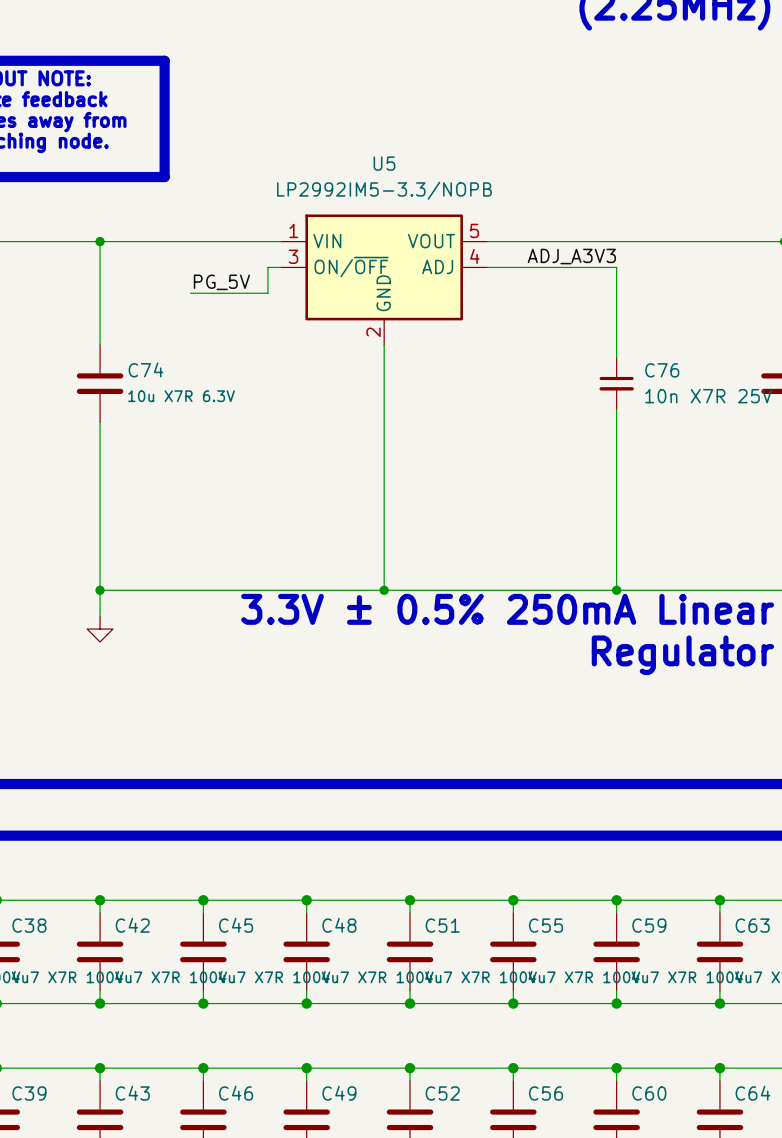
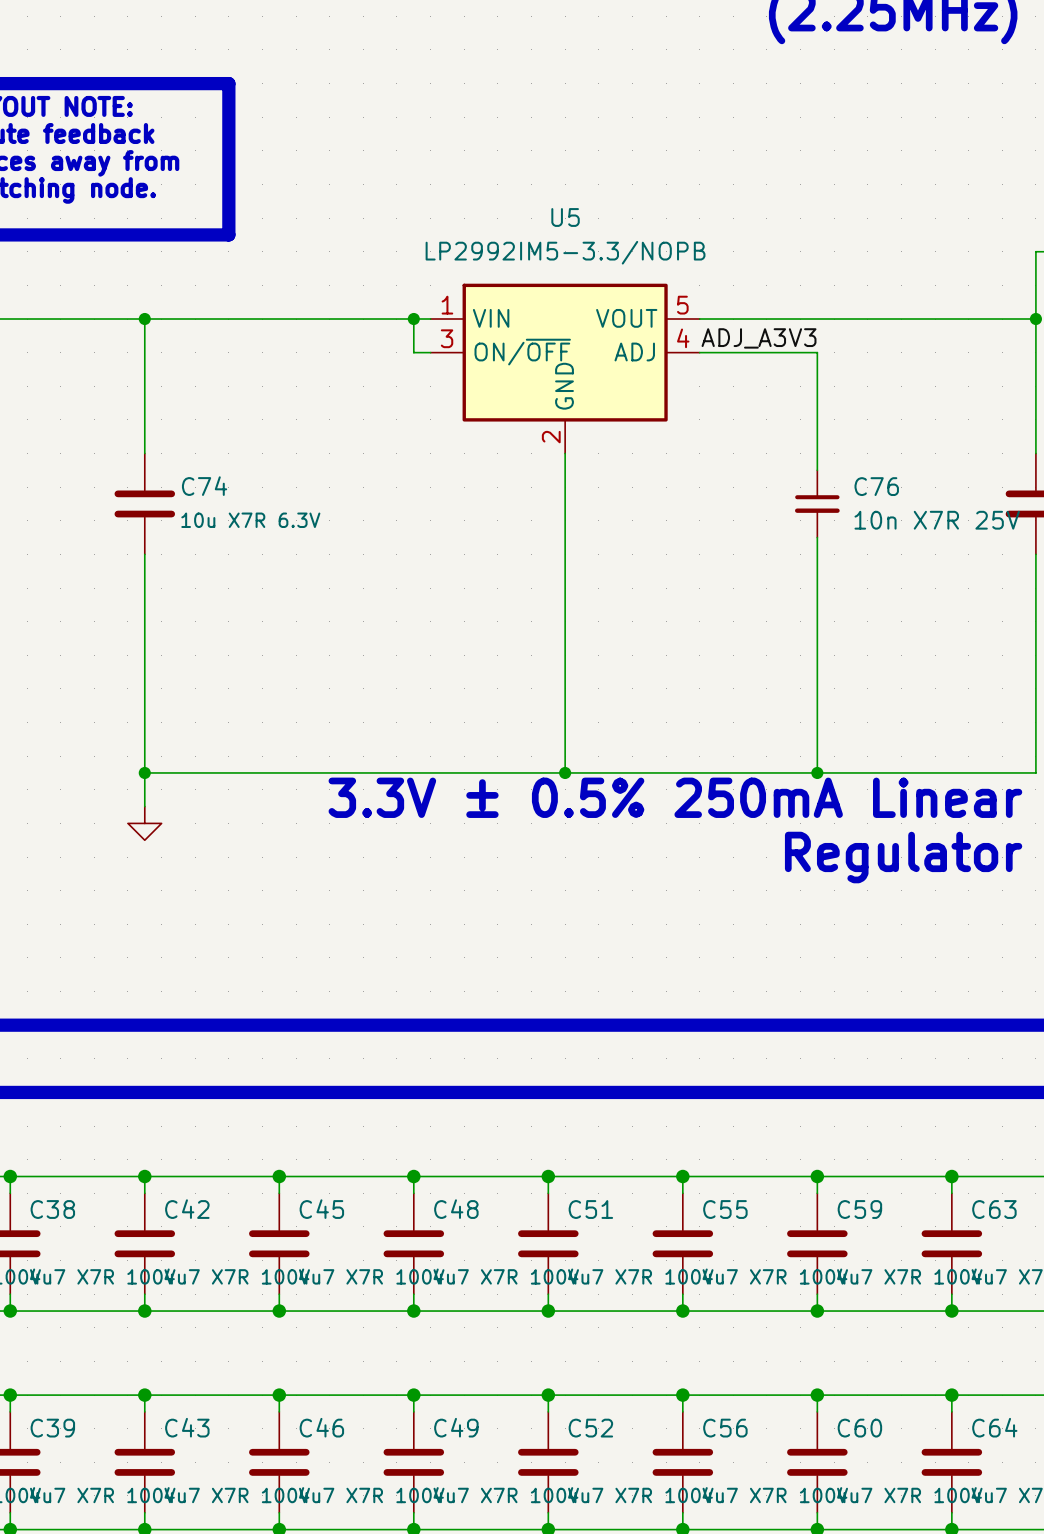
junction: none -> (413, 319)
wire: (280, 267) (267, 267) (267, 293) (190, 293) -> none
U5 position: (384, 279) -> (565, 368)
label: PG_5V (221, 282) -> none
wire: (384, 344) (384, 590) -> (565, 453) (565, 772)
junction position: (384, 590) -> (565, 772)

